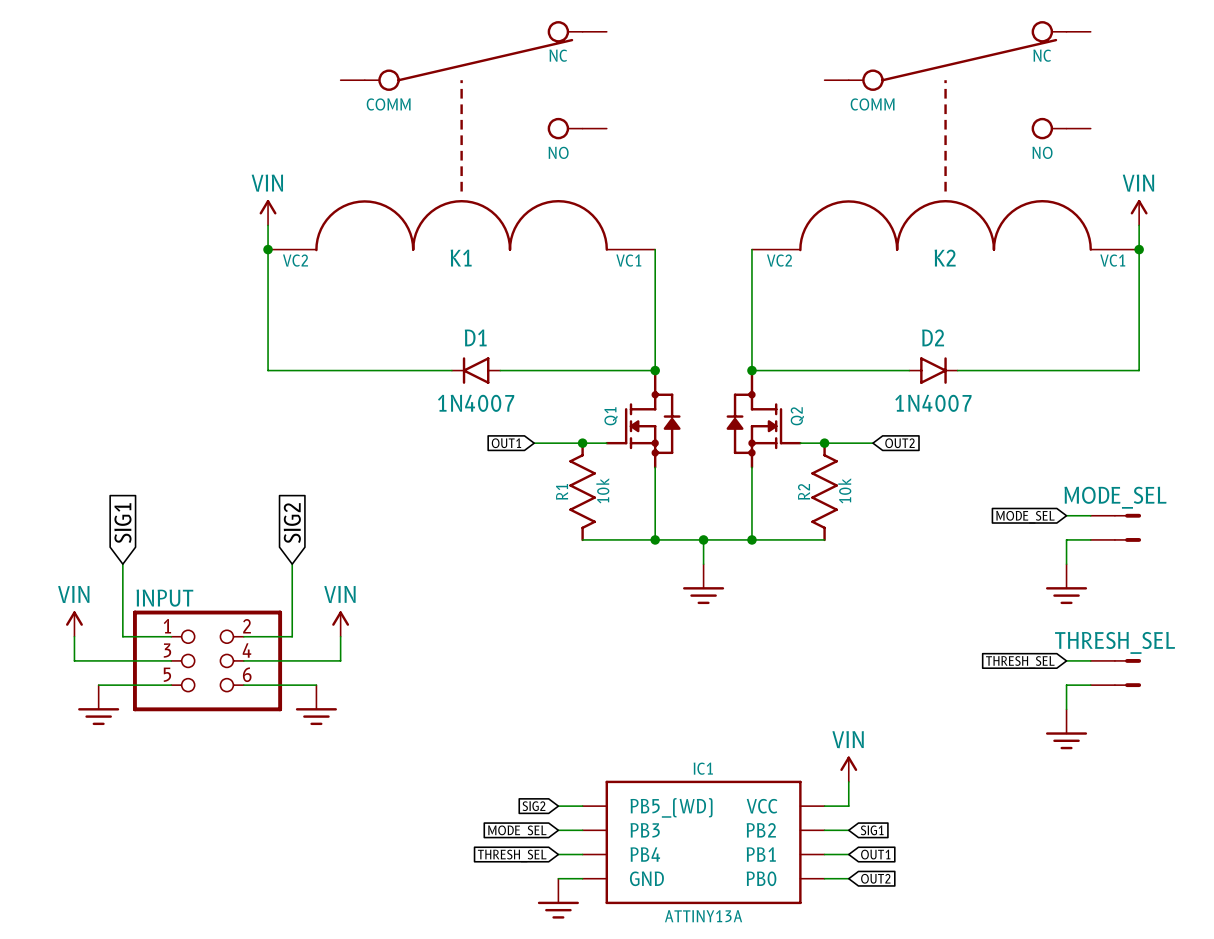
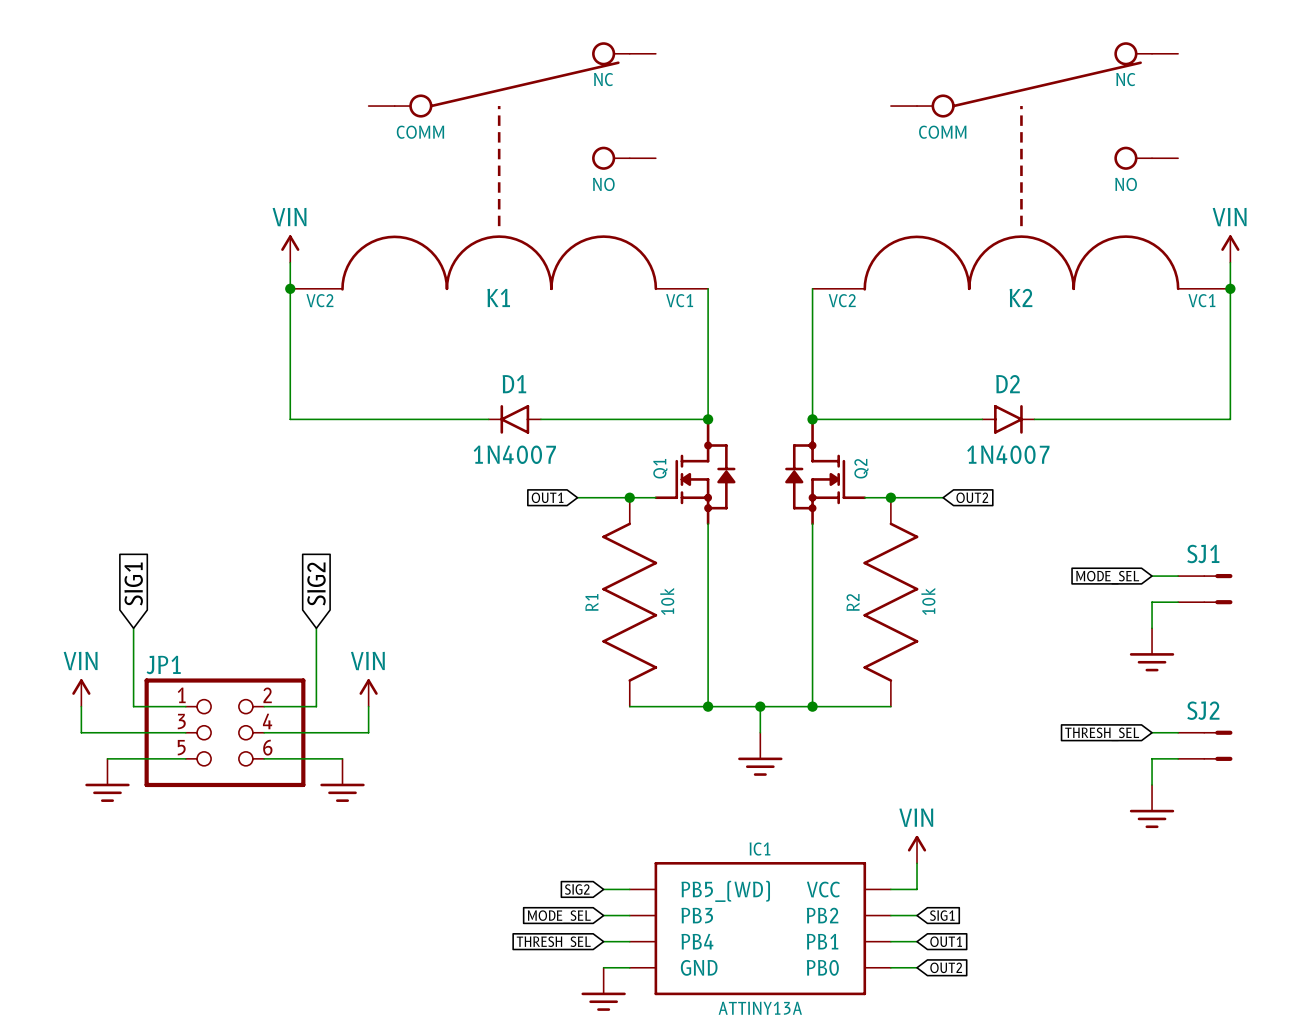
R1 symbol: [569, 441, 596, 542] -> [602, 497, 658, 707]
R2 symbol: [811, 441, 838, 542] -> [863, 497, 919, 707]
MODE_SEL name: MODE_SEL (1115, 497) -> SJ1 (1203, 553)
wire: (582, 539) (824, 539) -> (629, 706) (890, 706)
wire: none -> (708, 602) (708, 706)
junction: (655, 539) -> none
wire: (703, 539) (703, 564) -> (760, 706) (760, 732)
junction: (703, 539) -> none
wire: none -> (812, 602) (812, 706)
junction: (751, 539) -> none
power symbol position: (703, 584) -> (760, 754)
INPUT name: INPUT (164, 598) -> JP1 (163, 664)
junction: none -> (708, 706)
junction: none -> (760, 706)
junction: none -> (812, 706)
THRESH_SEL name: THRESH_SEL (1115, 642) -> SJ2 (1203, 710)

